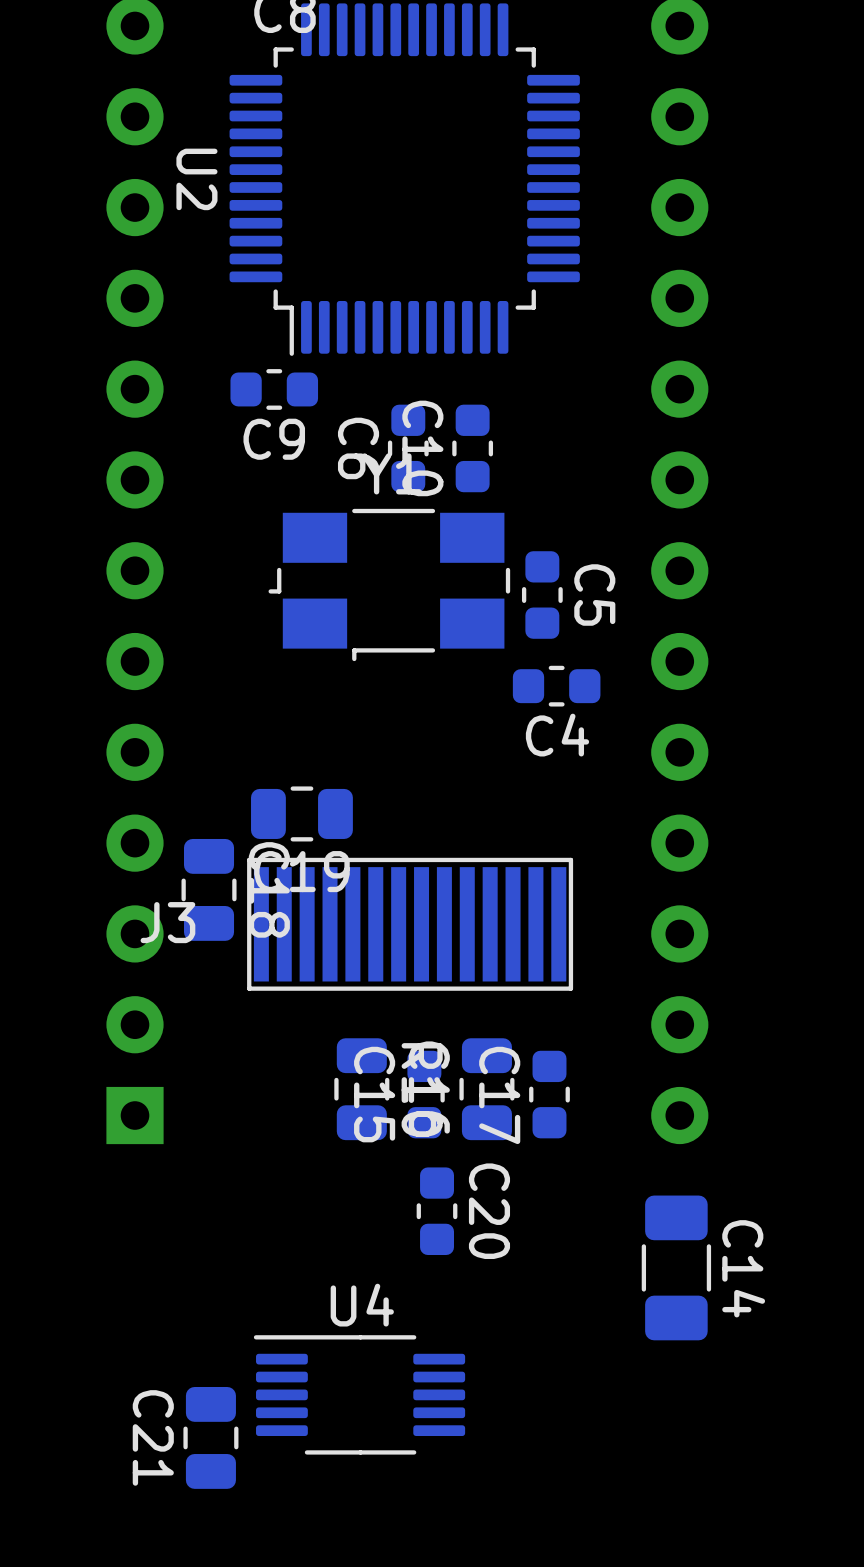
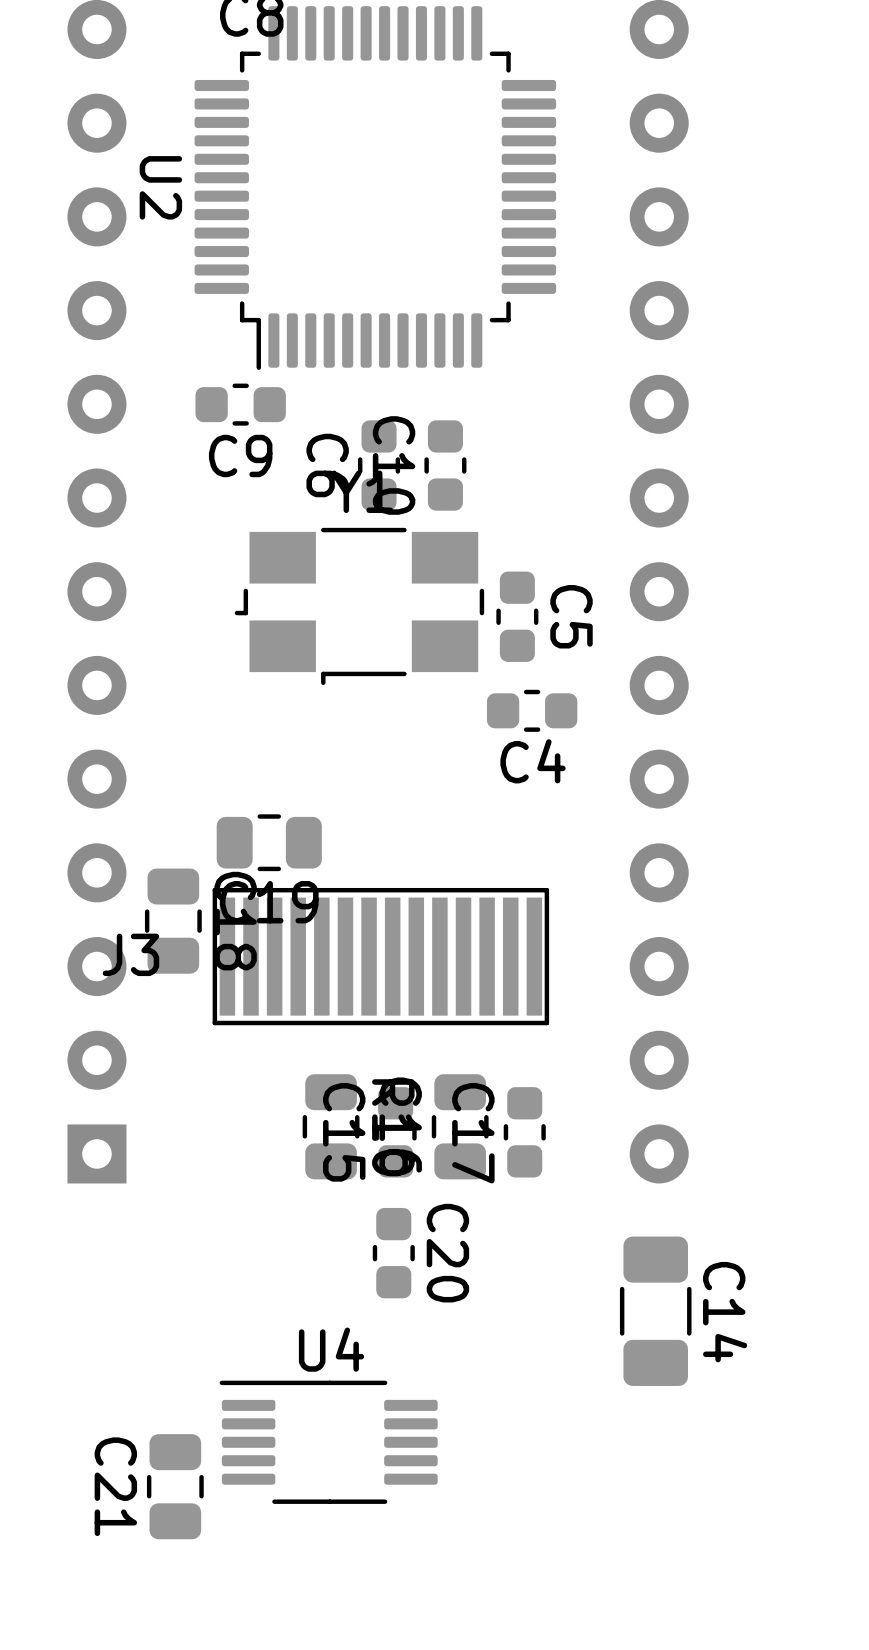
C20 position: (437, 1211) -> (393, 1253)

